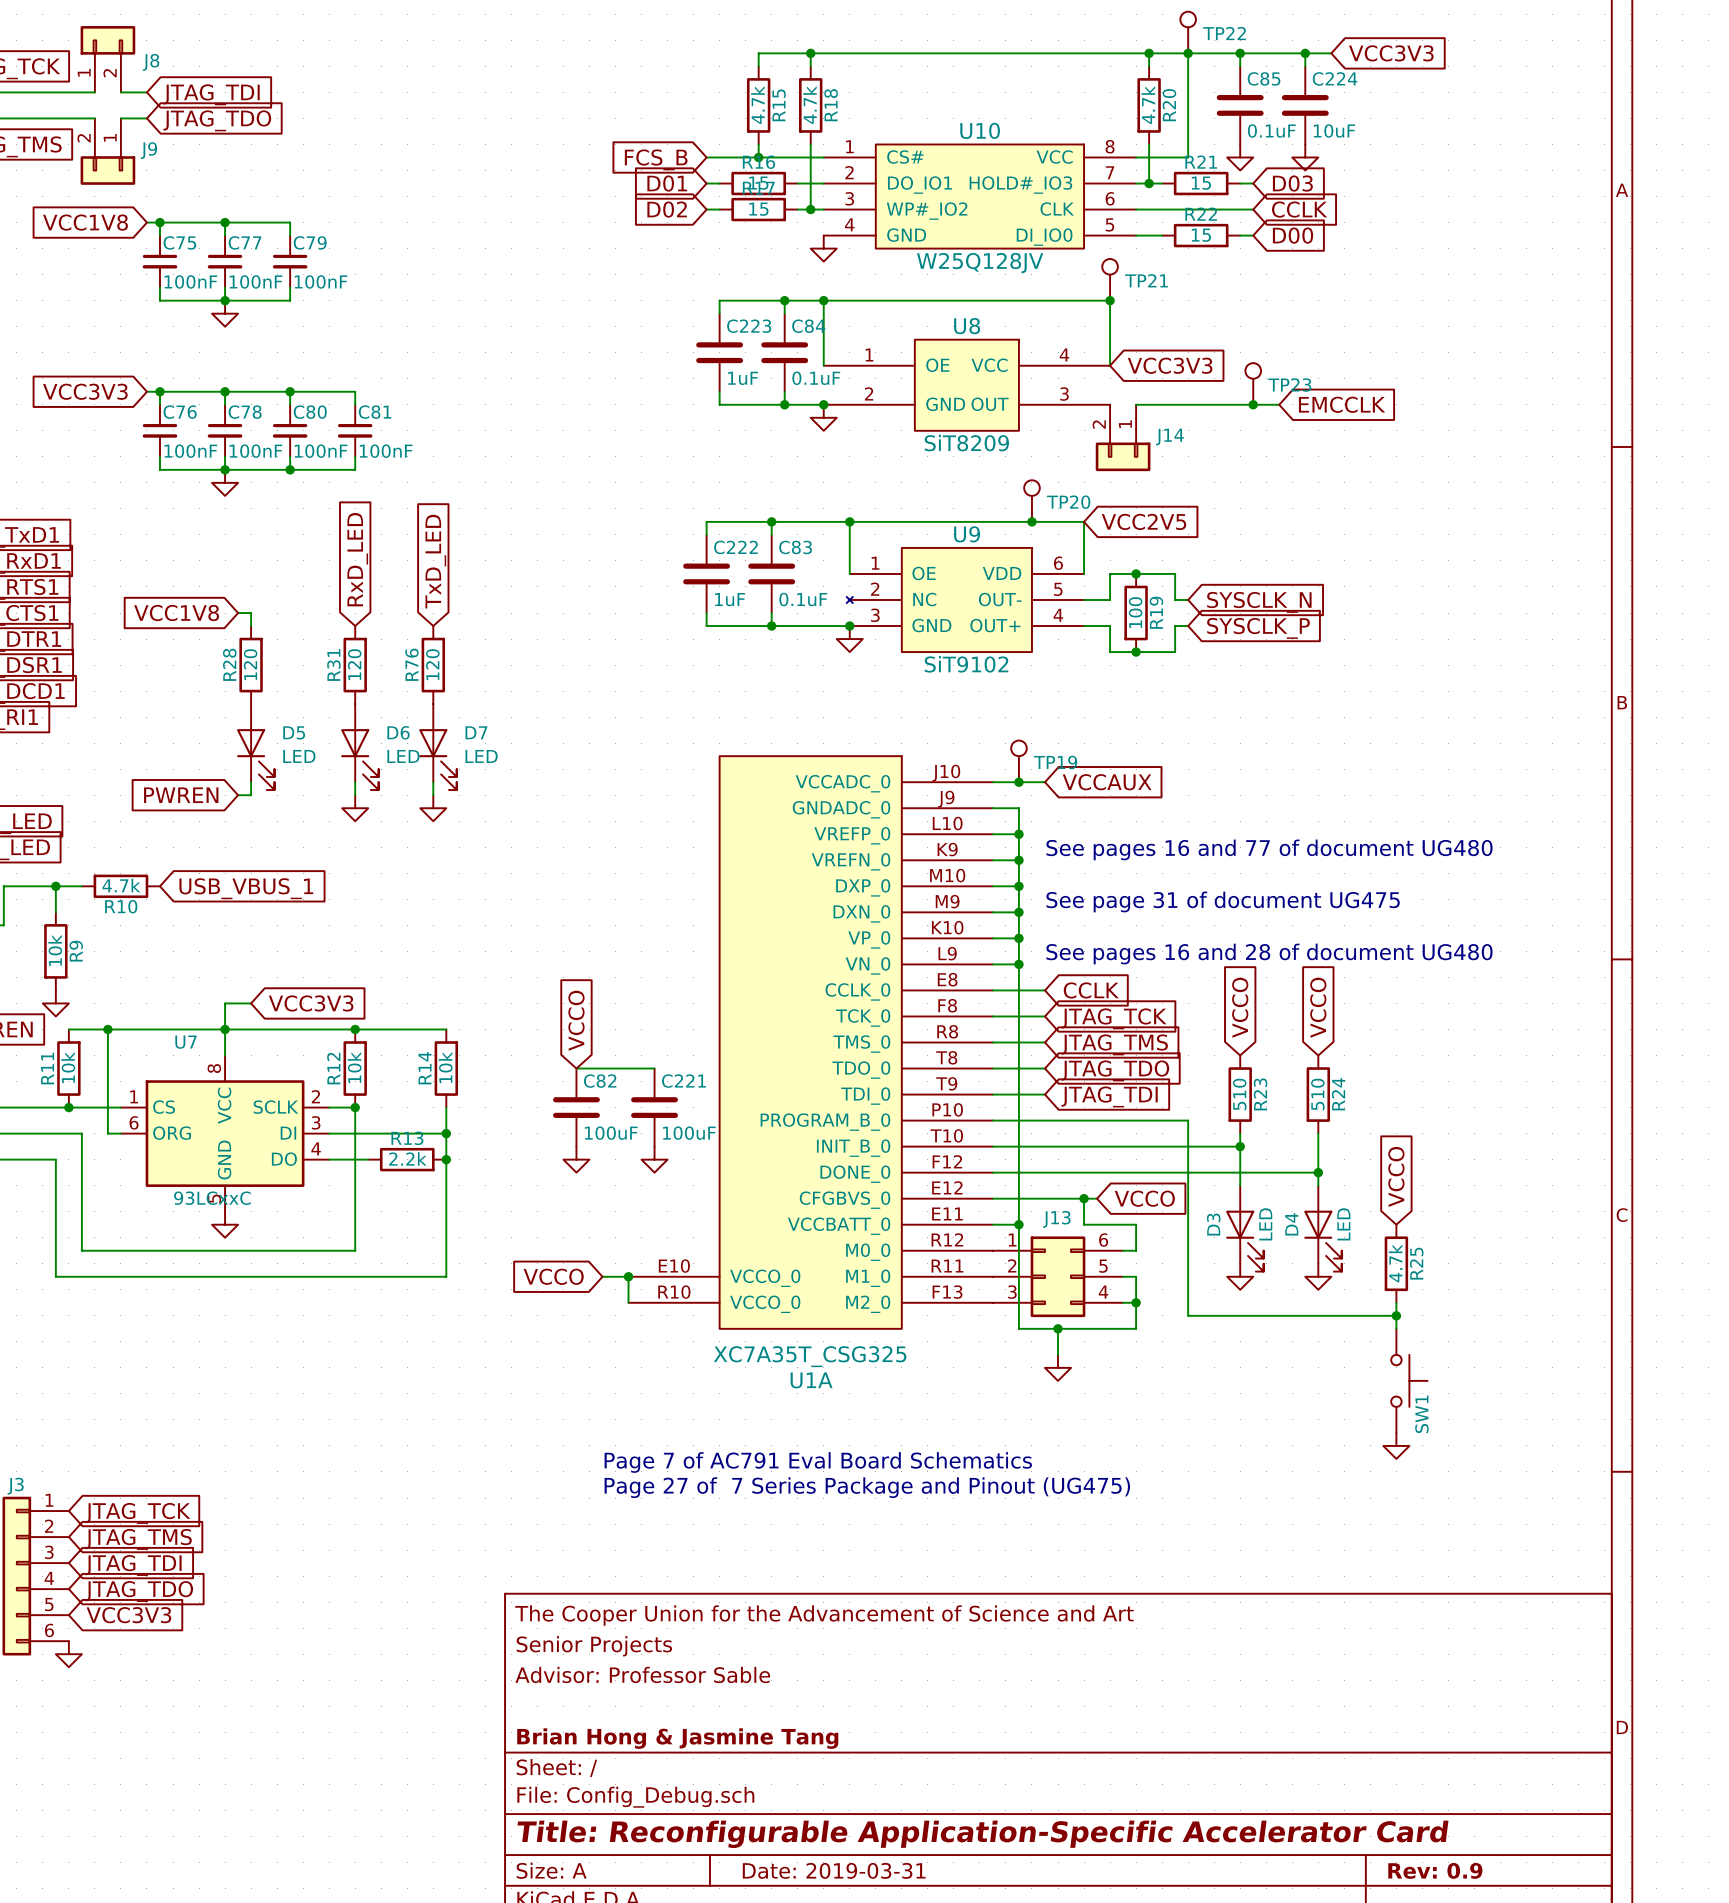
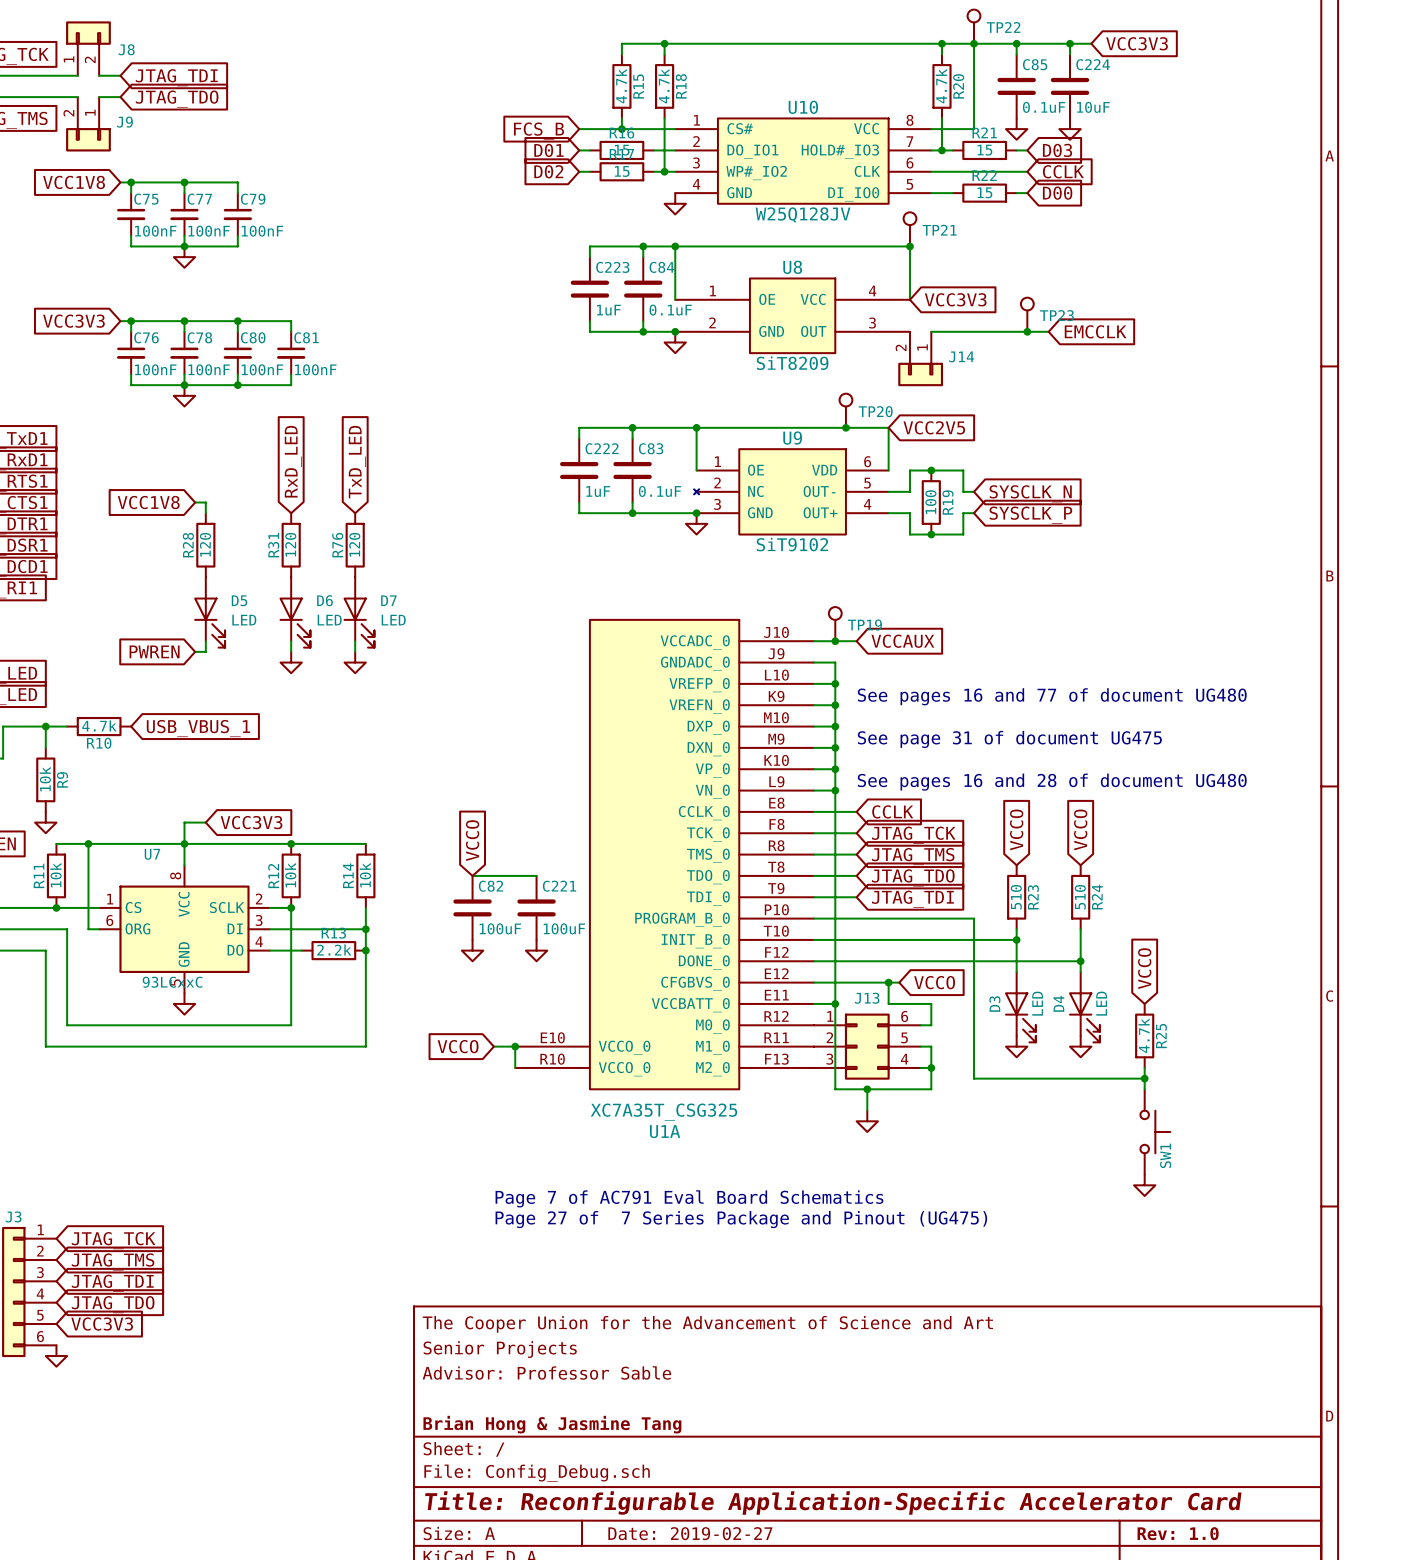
title block: Date: 2019-03-31 (834, 1870) -> Date: 2019-02-27 (690, 1533)
title block: Rev: 0.9 (1435, 1870) -> Rev: 1.0 (1178, 1533)

